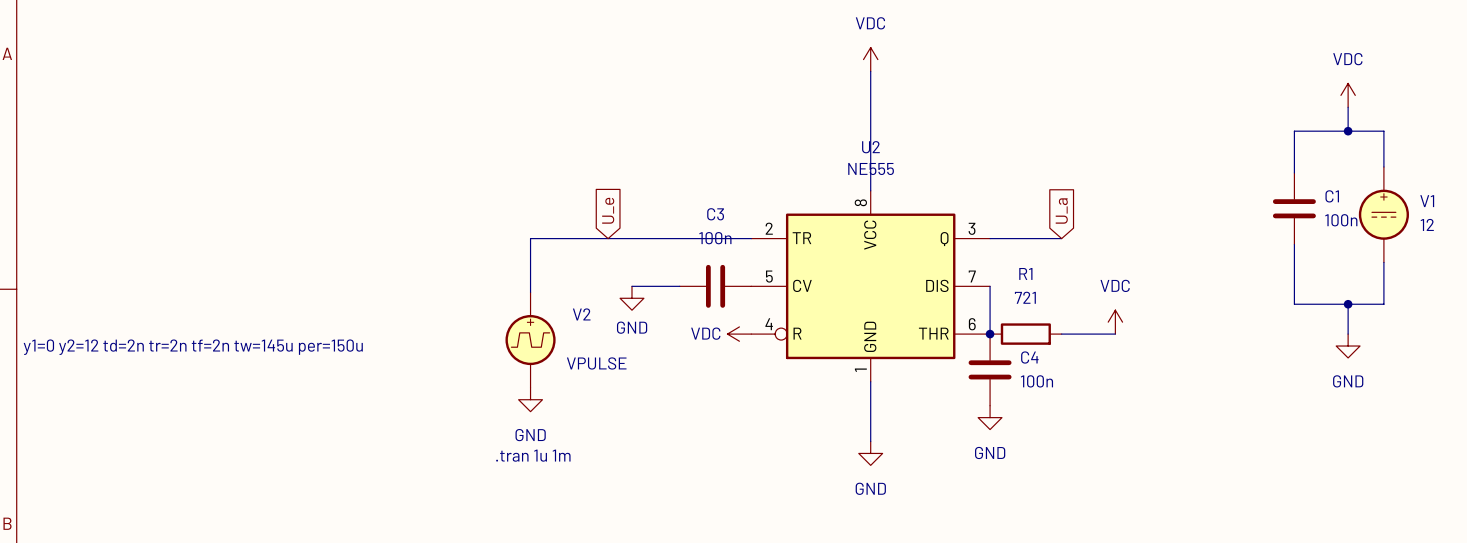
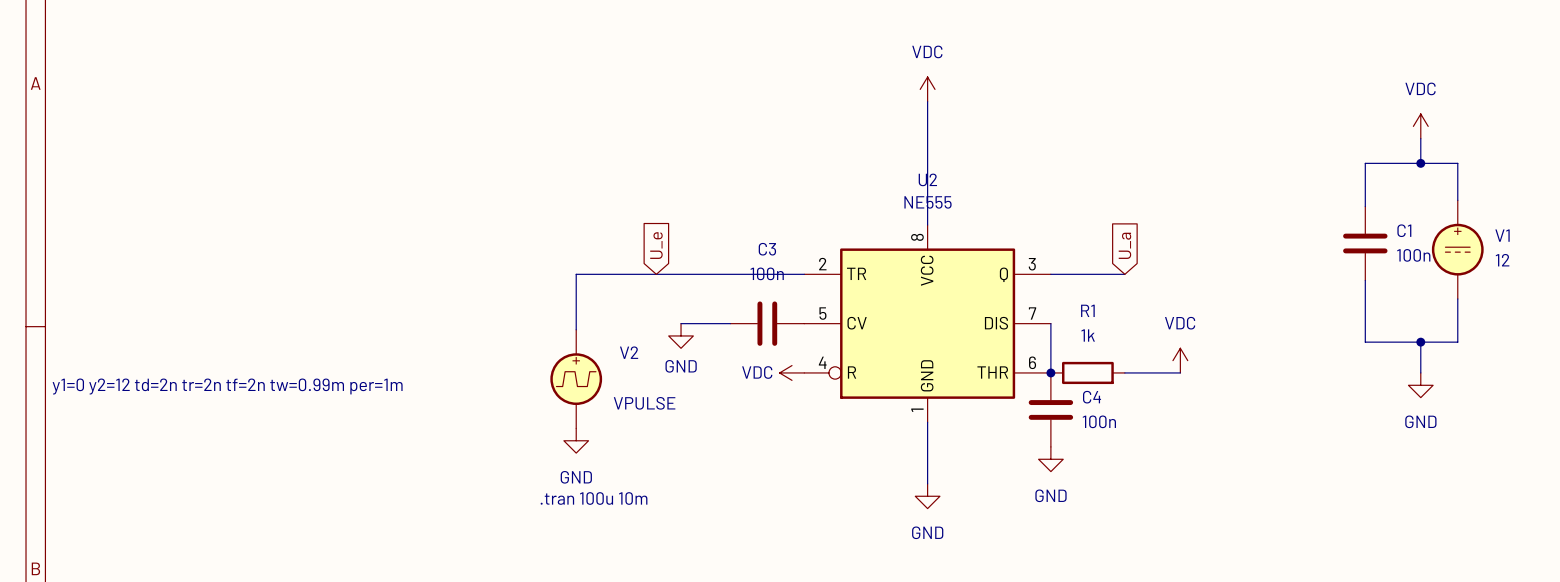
R1 value: 721 (1025, 297) -> 1k (1088, 335)
V2 text: y1=0 y2=12 td=2n tr=2n tf=2n tw=145u per=150u (193, 347) -> y1=0 y2=12 td=2n tr=2n tf=2n tw=0.99m per=1m (227, 386)
text: .tran 1u 1m (533, 455) -> .tran 100u 10m (594, 498)

